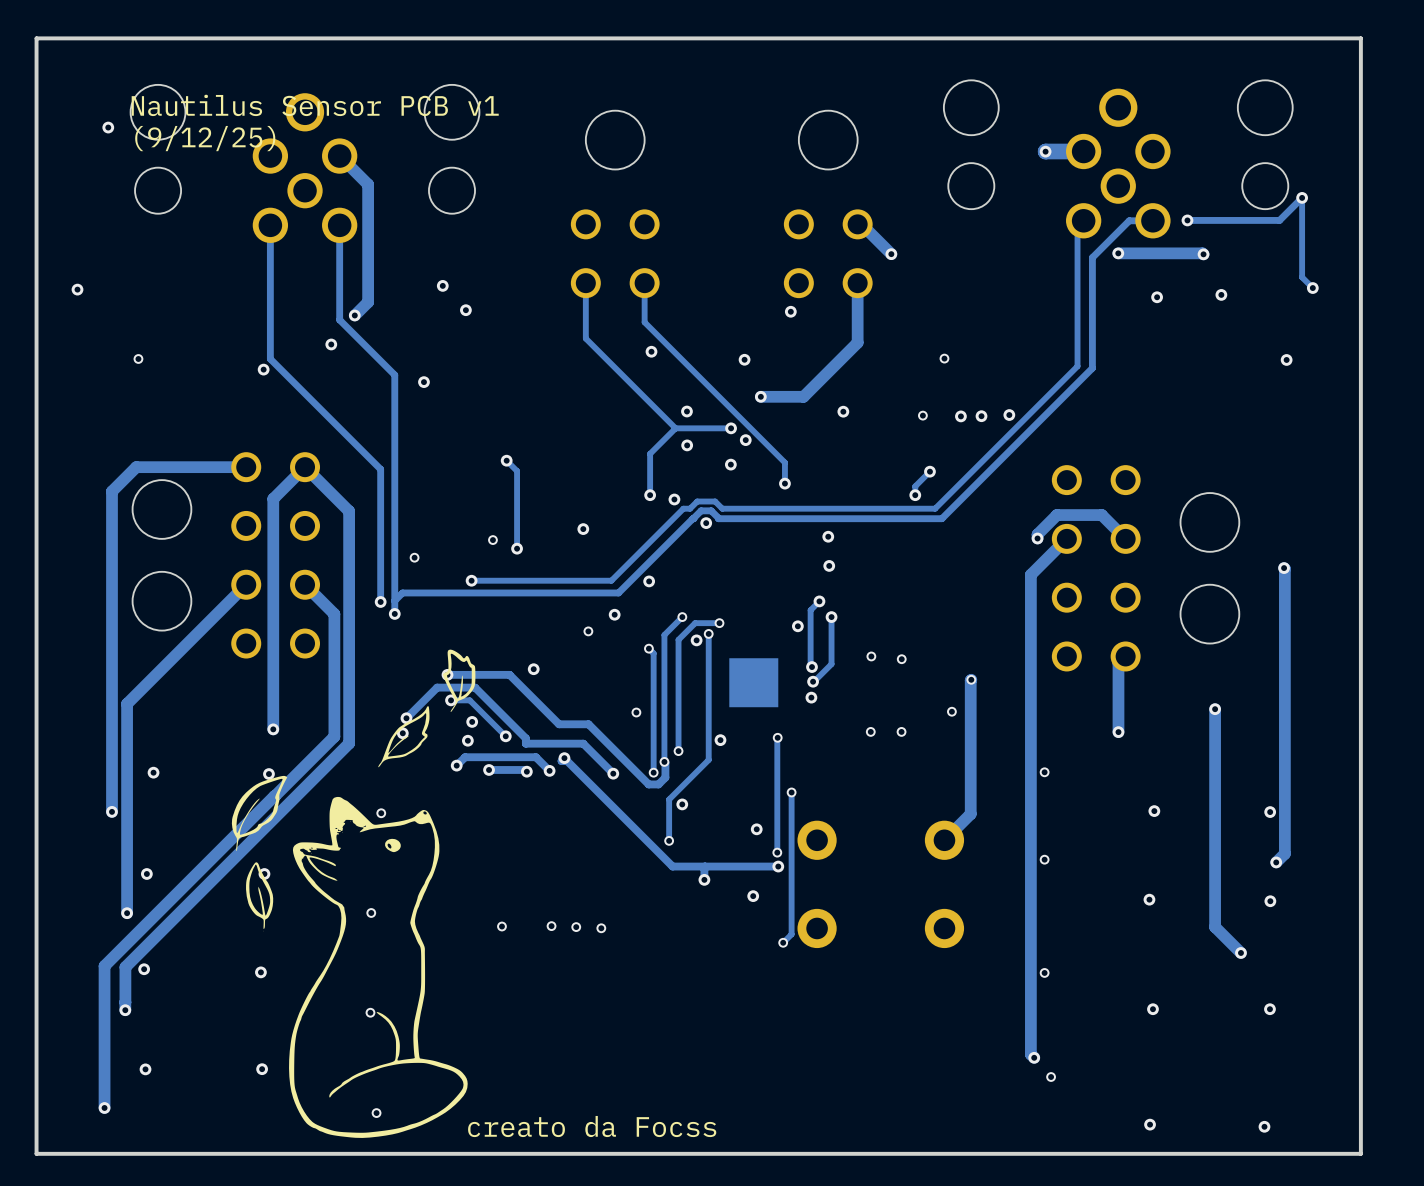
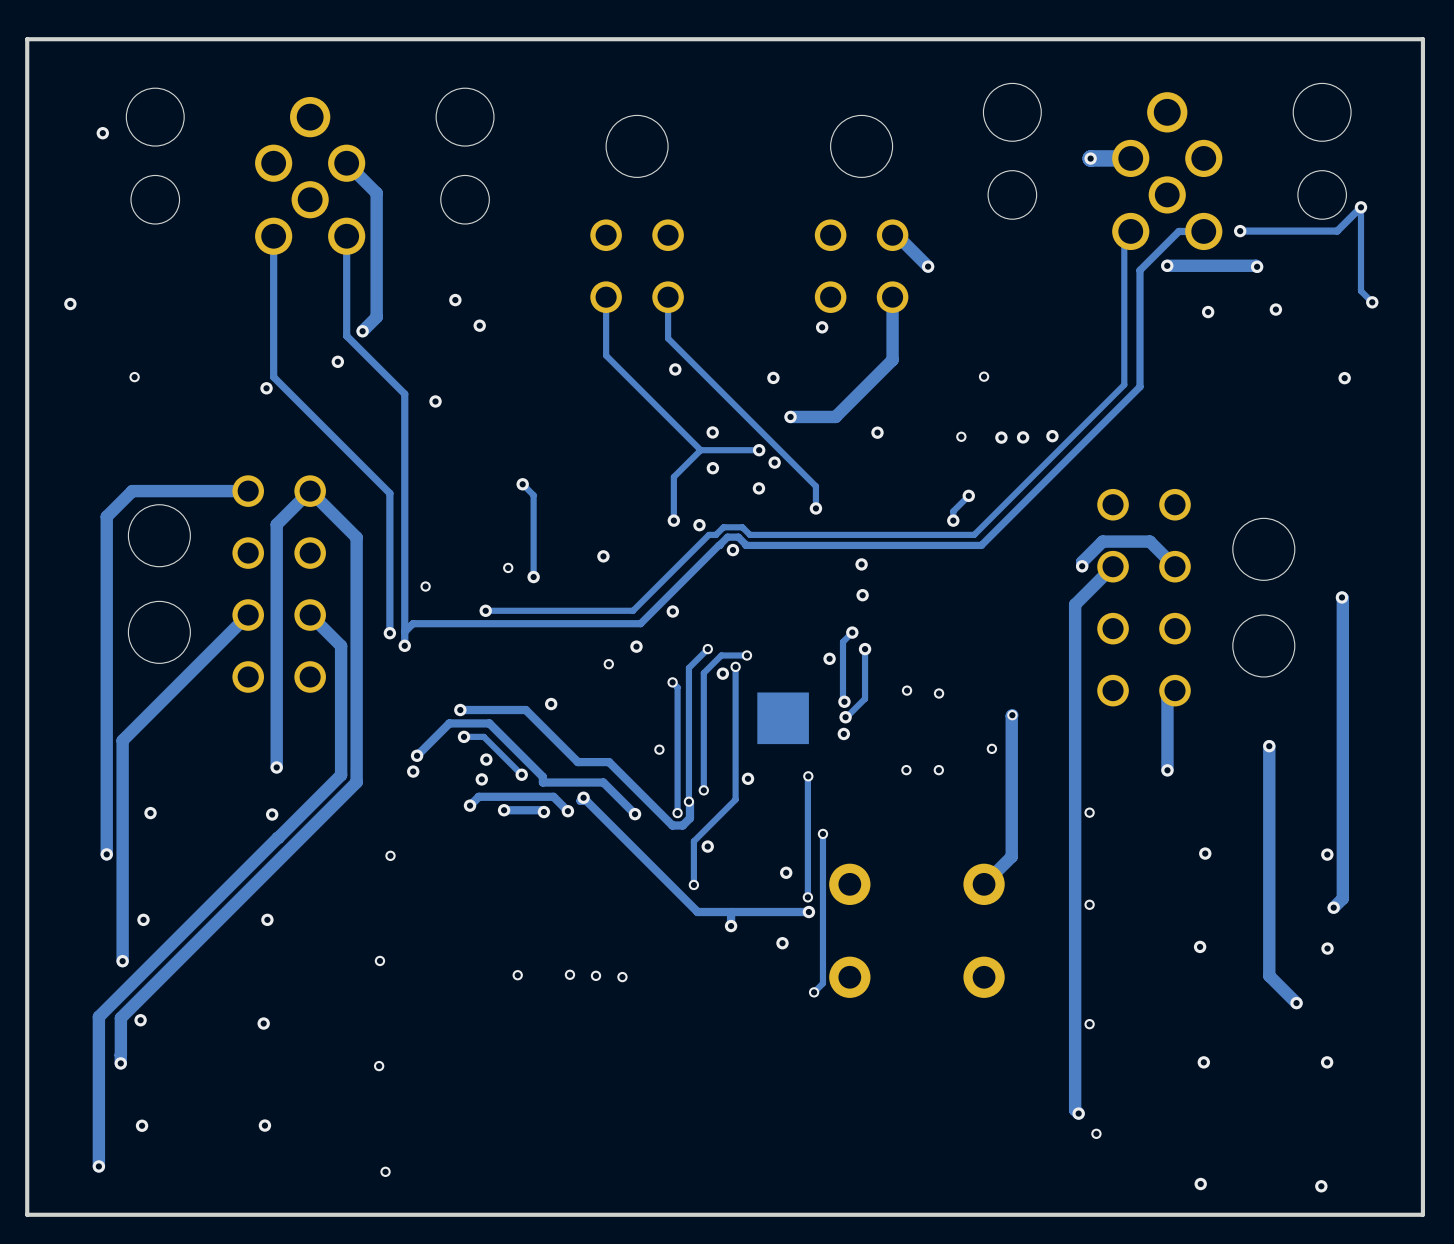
text: Nautilus Sensor PCB v1 (315, 105) -> none
text: (9/12/25) (205, 138) -> none
drawing: [231, 649, 476, 1138] -> none
text: creato da Focss (592, 1126) -> none

